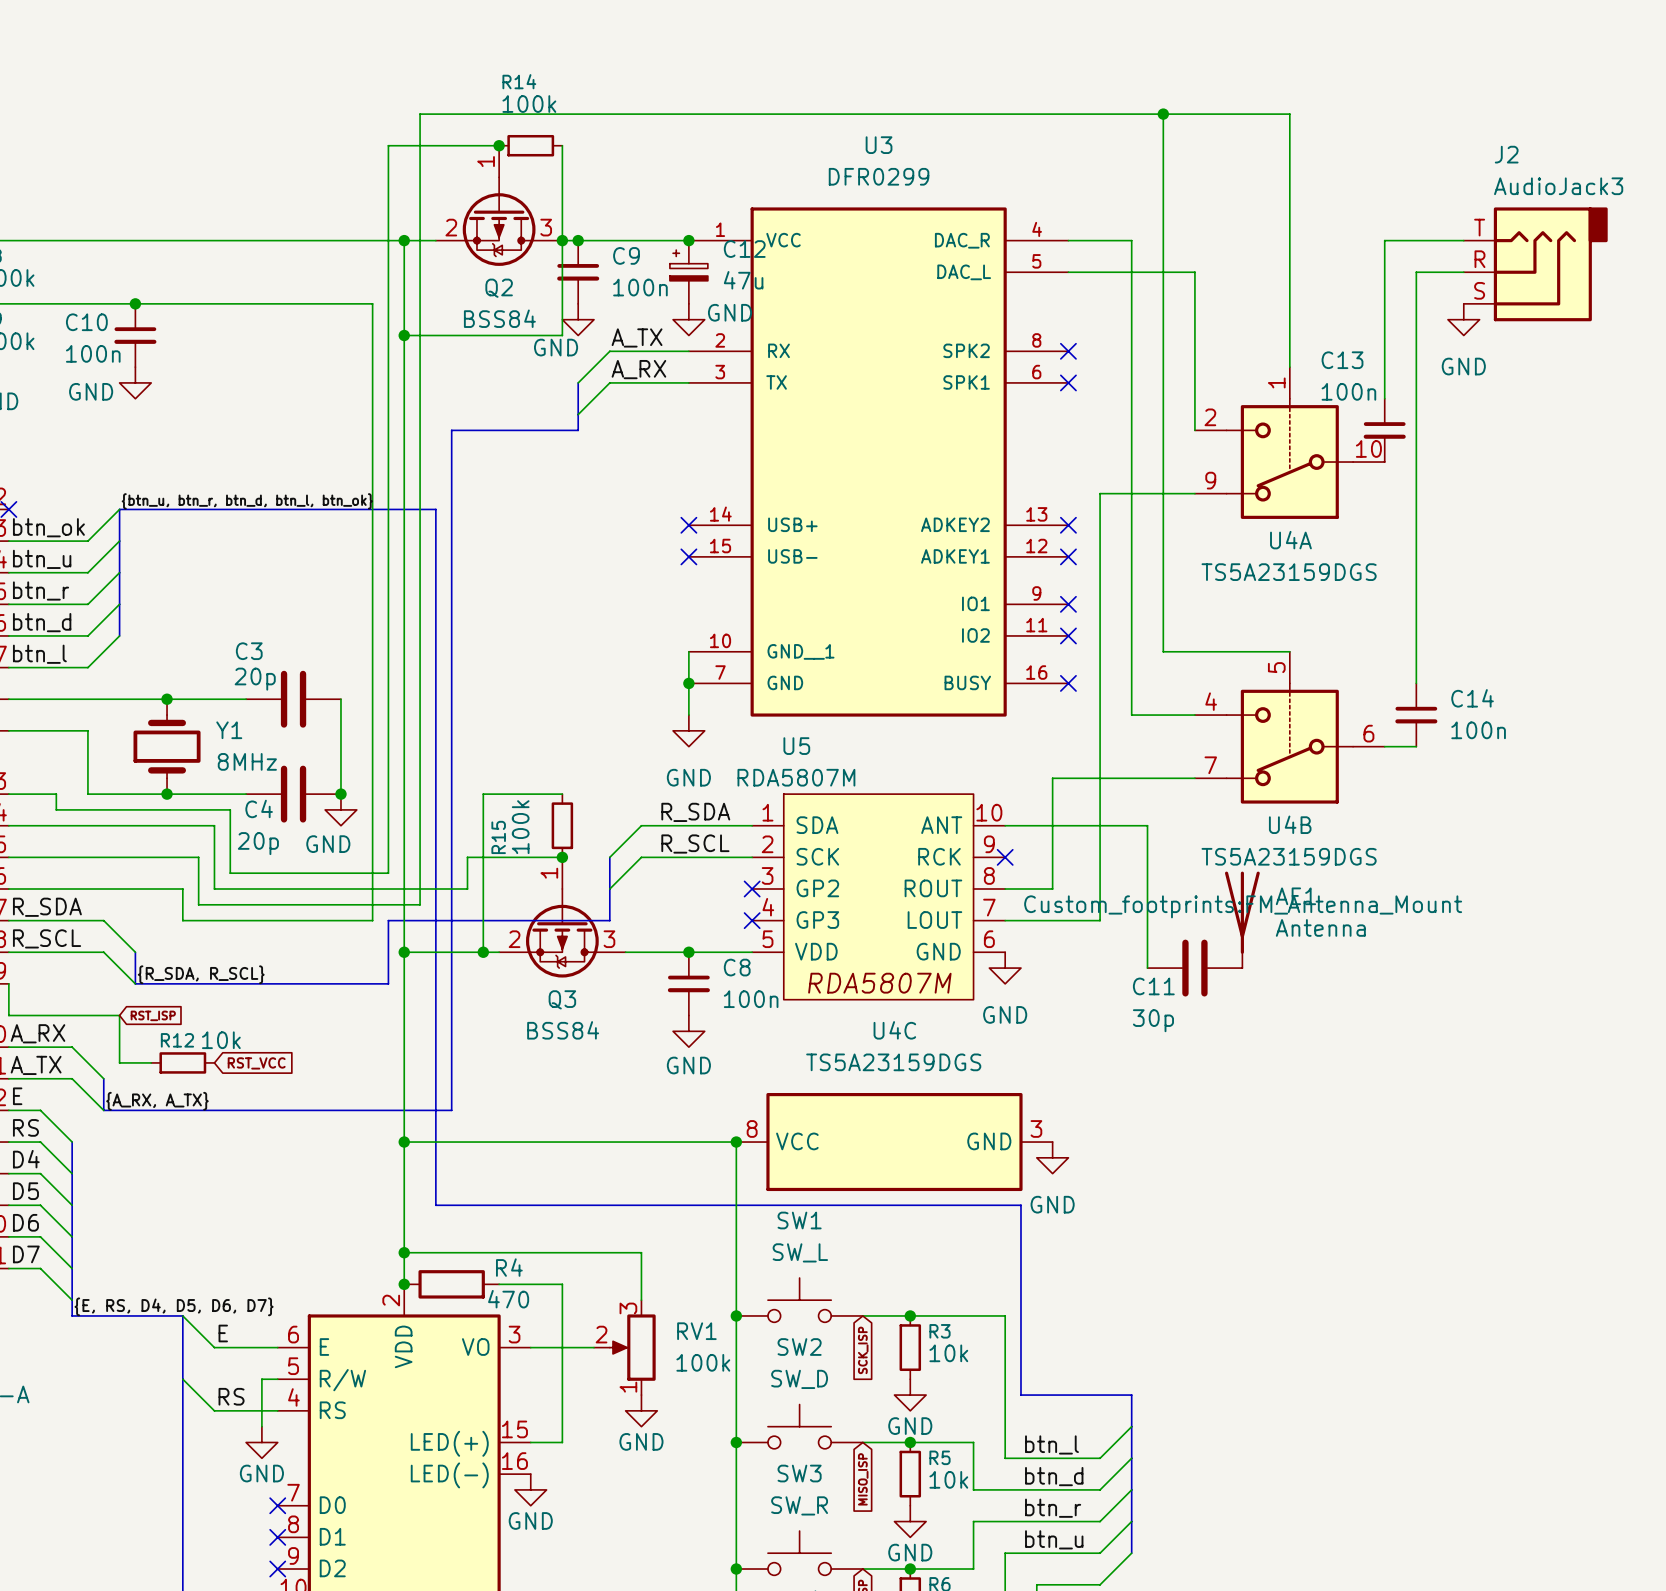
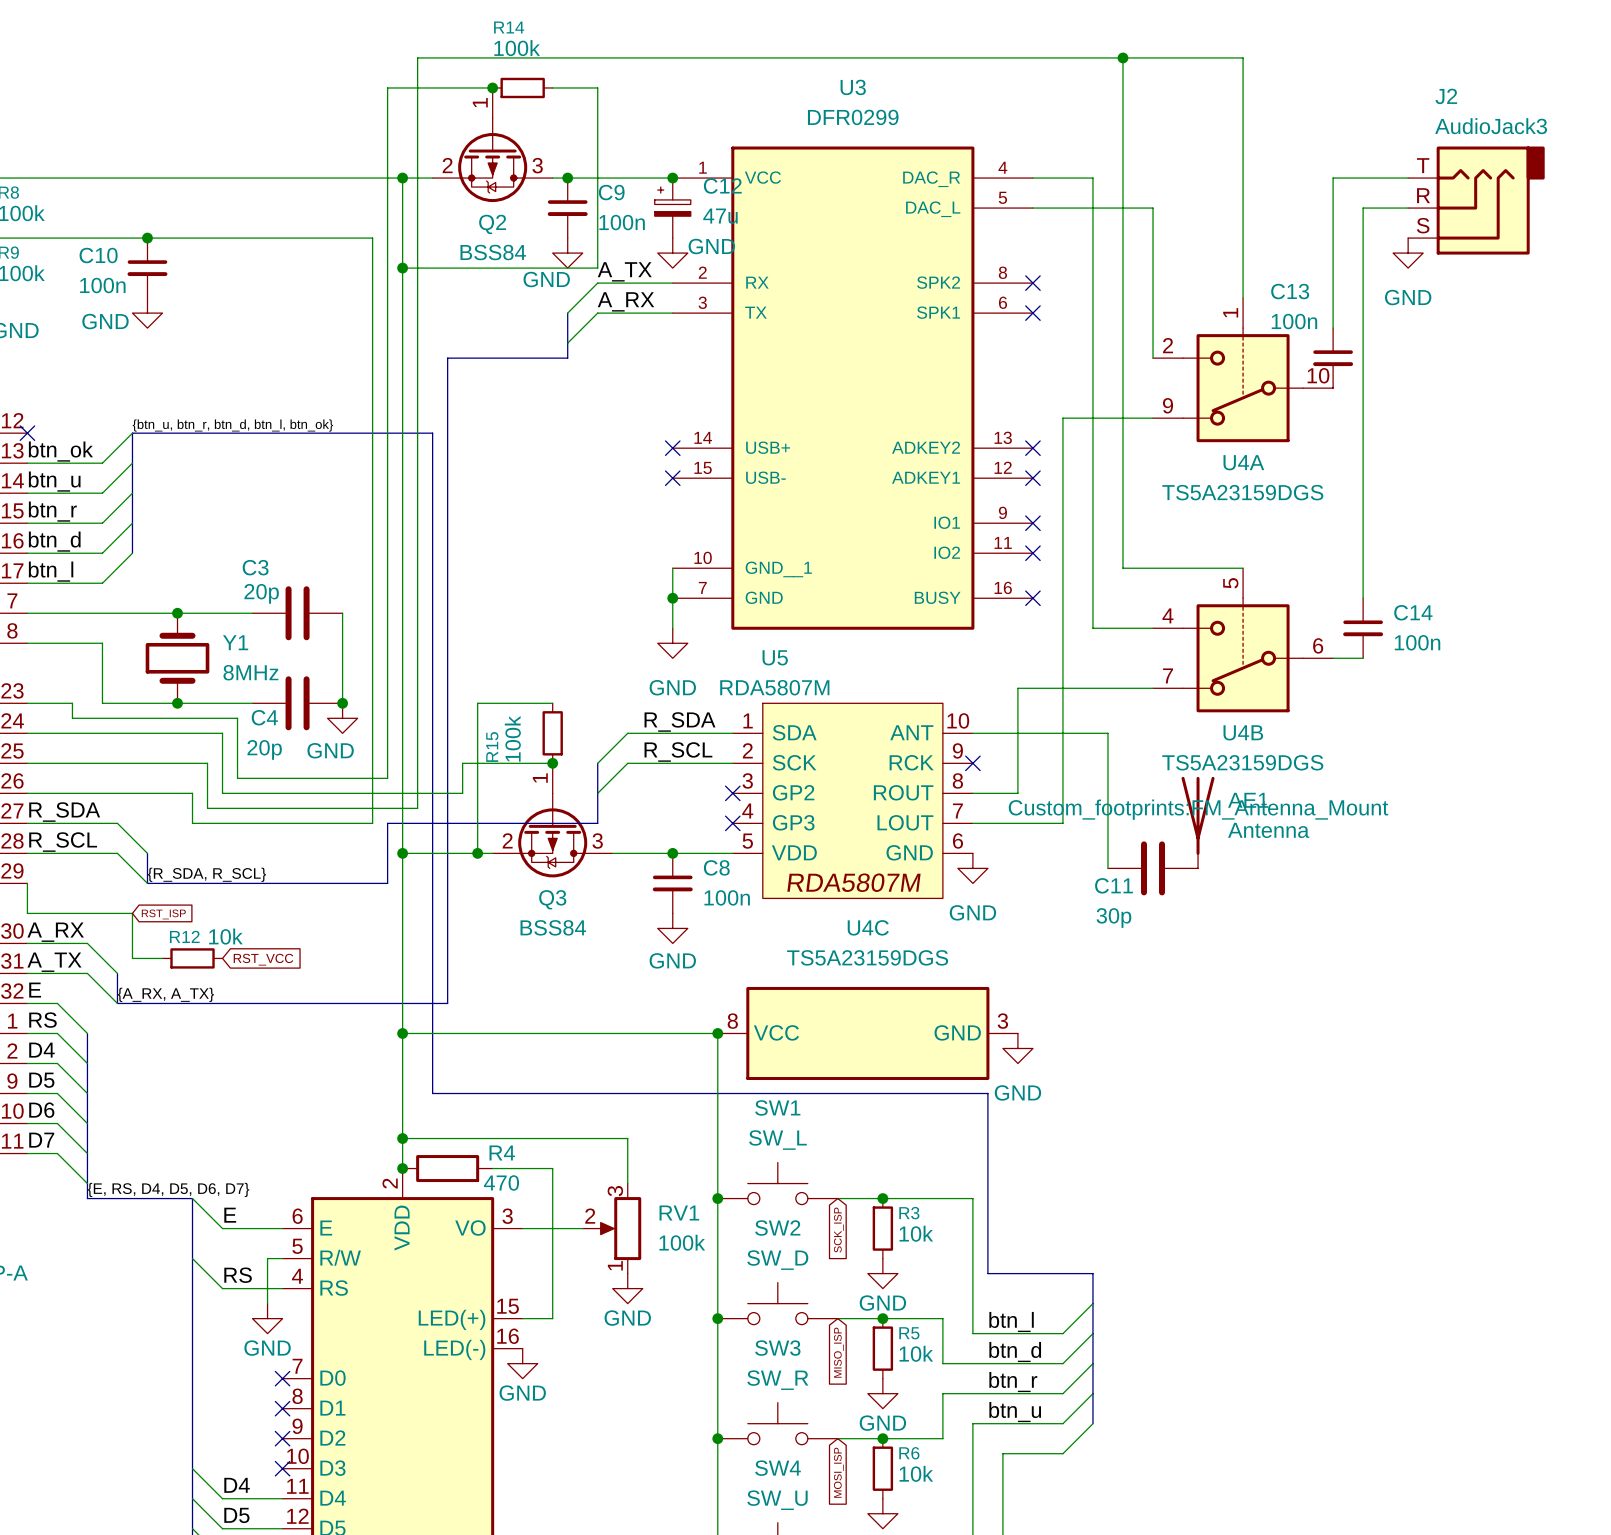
wire: (562, 145) (562, 335) -> (552, 87) (597, 87) (597, 268) (552, 268)
junction: (562, 240) -> none

